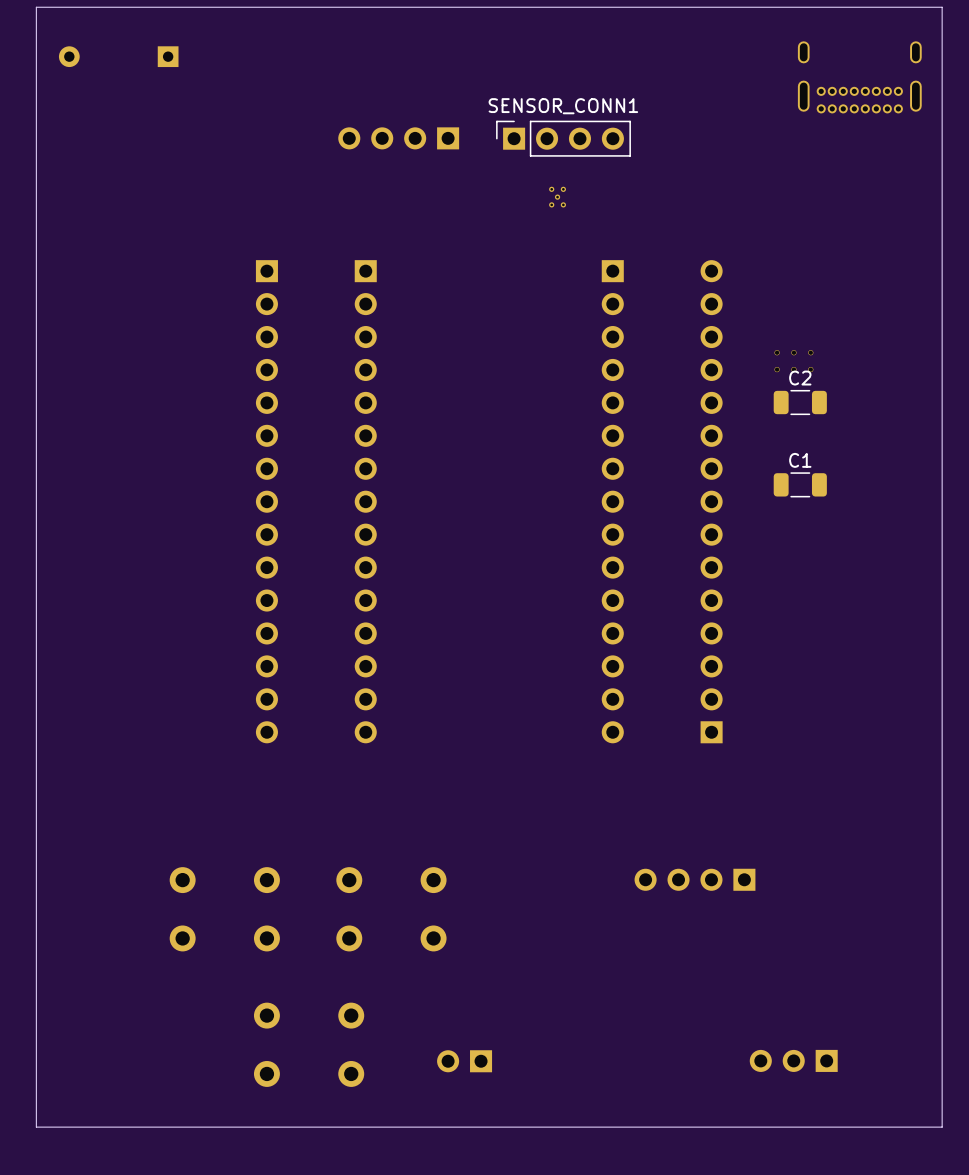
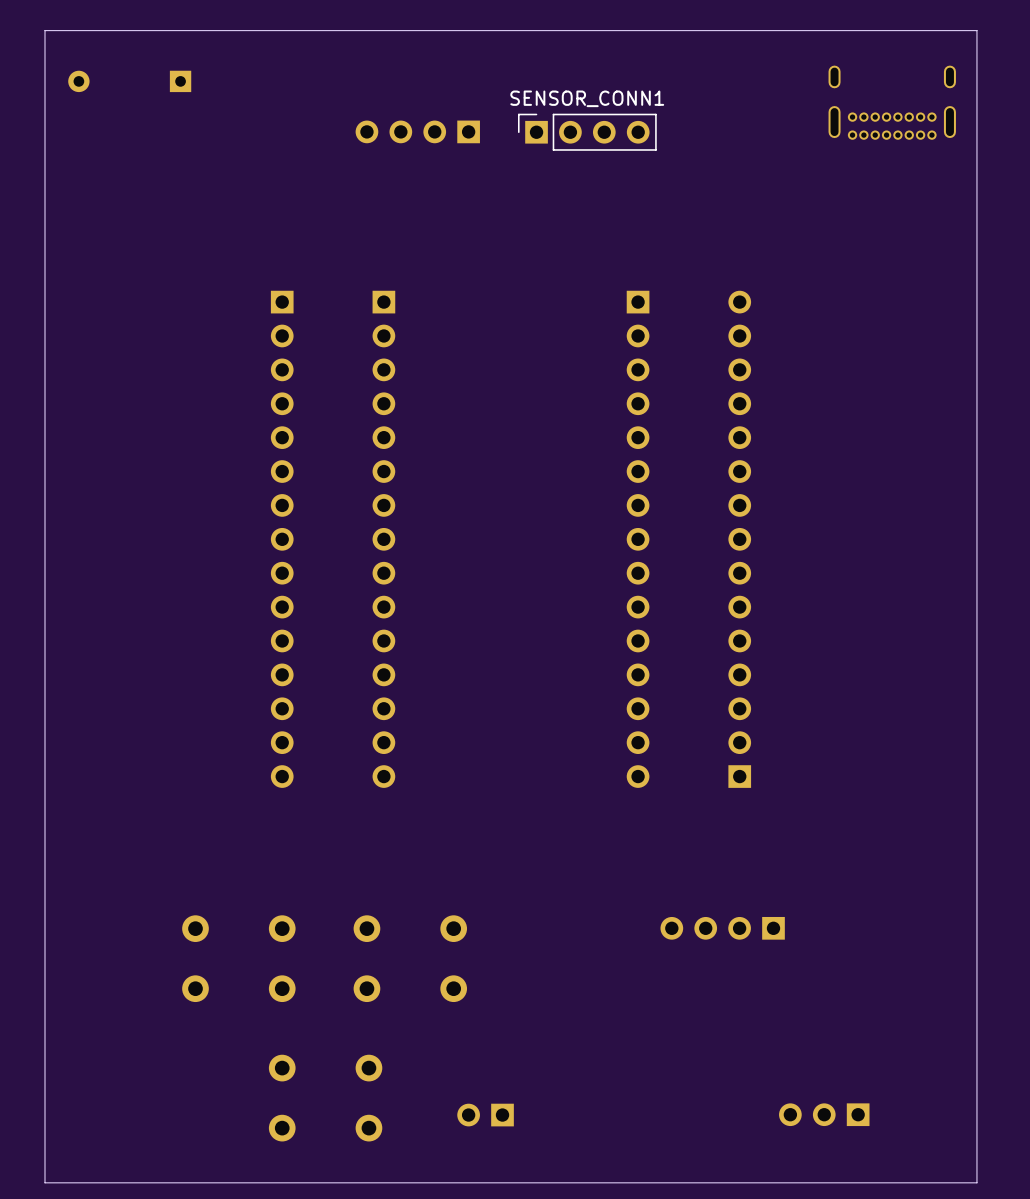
part position: (398, 138) -> (417, 131)
SENSOR_CONN1 position: (563, 138) -> (587, 132)
part: (557, 197) -> none
part: (793, 361) -> none
C2: (800, 402) -> none
C1: (800, 484) -> none

